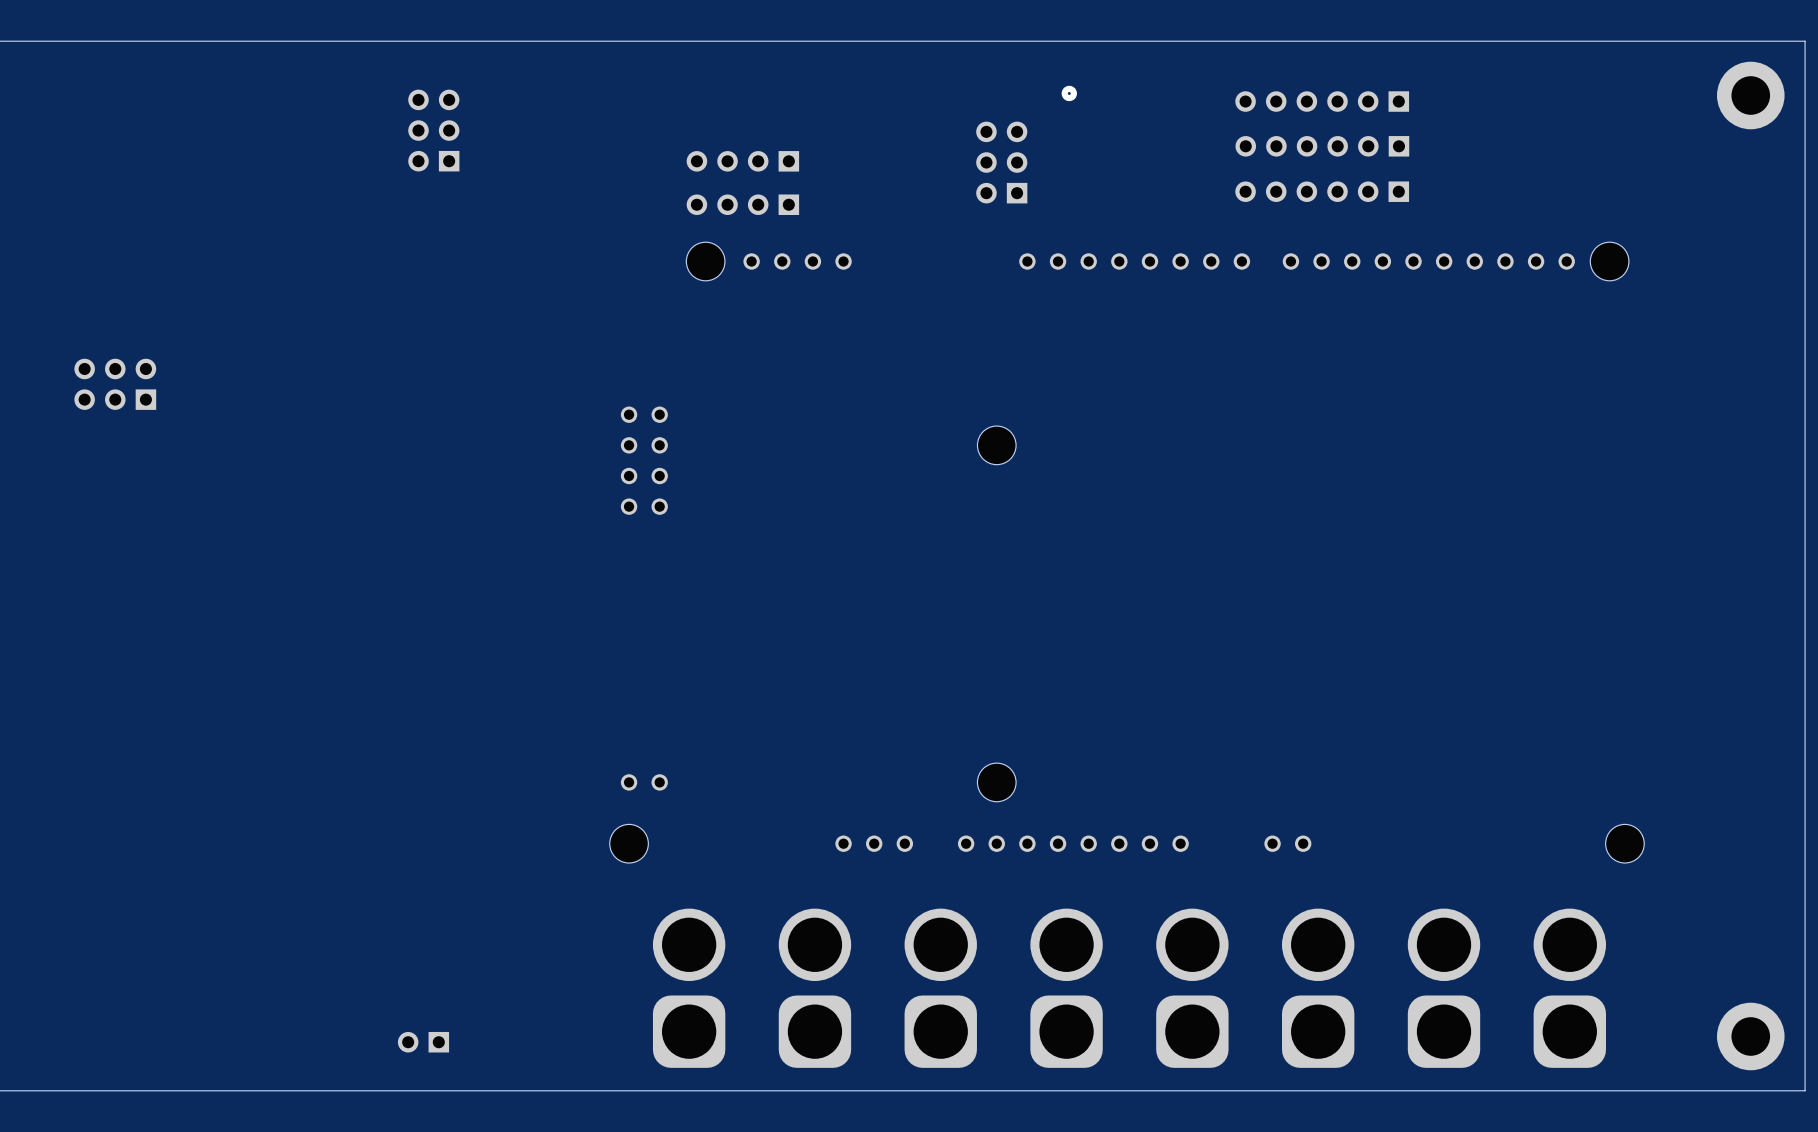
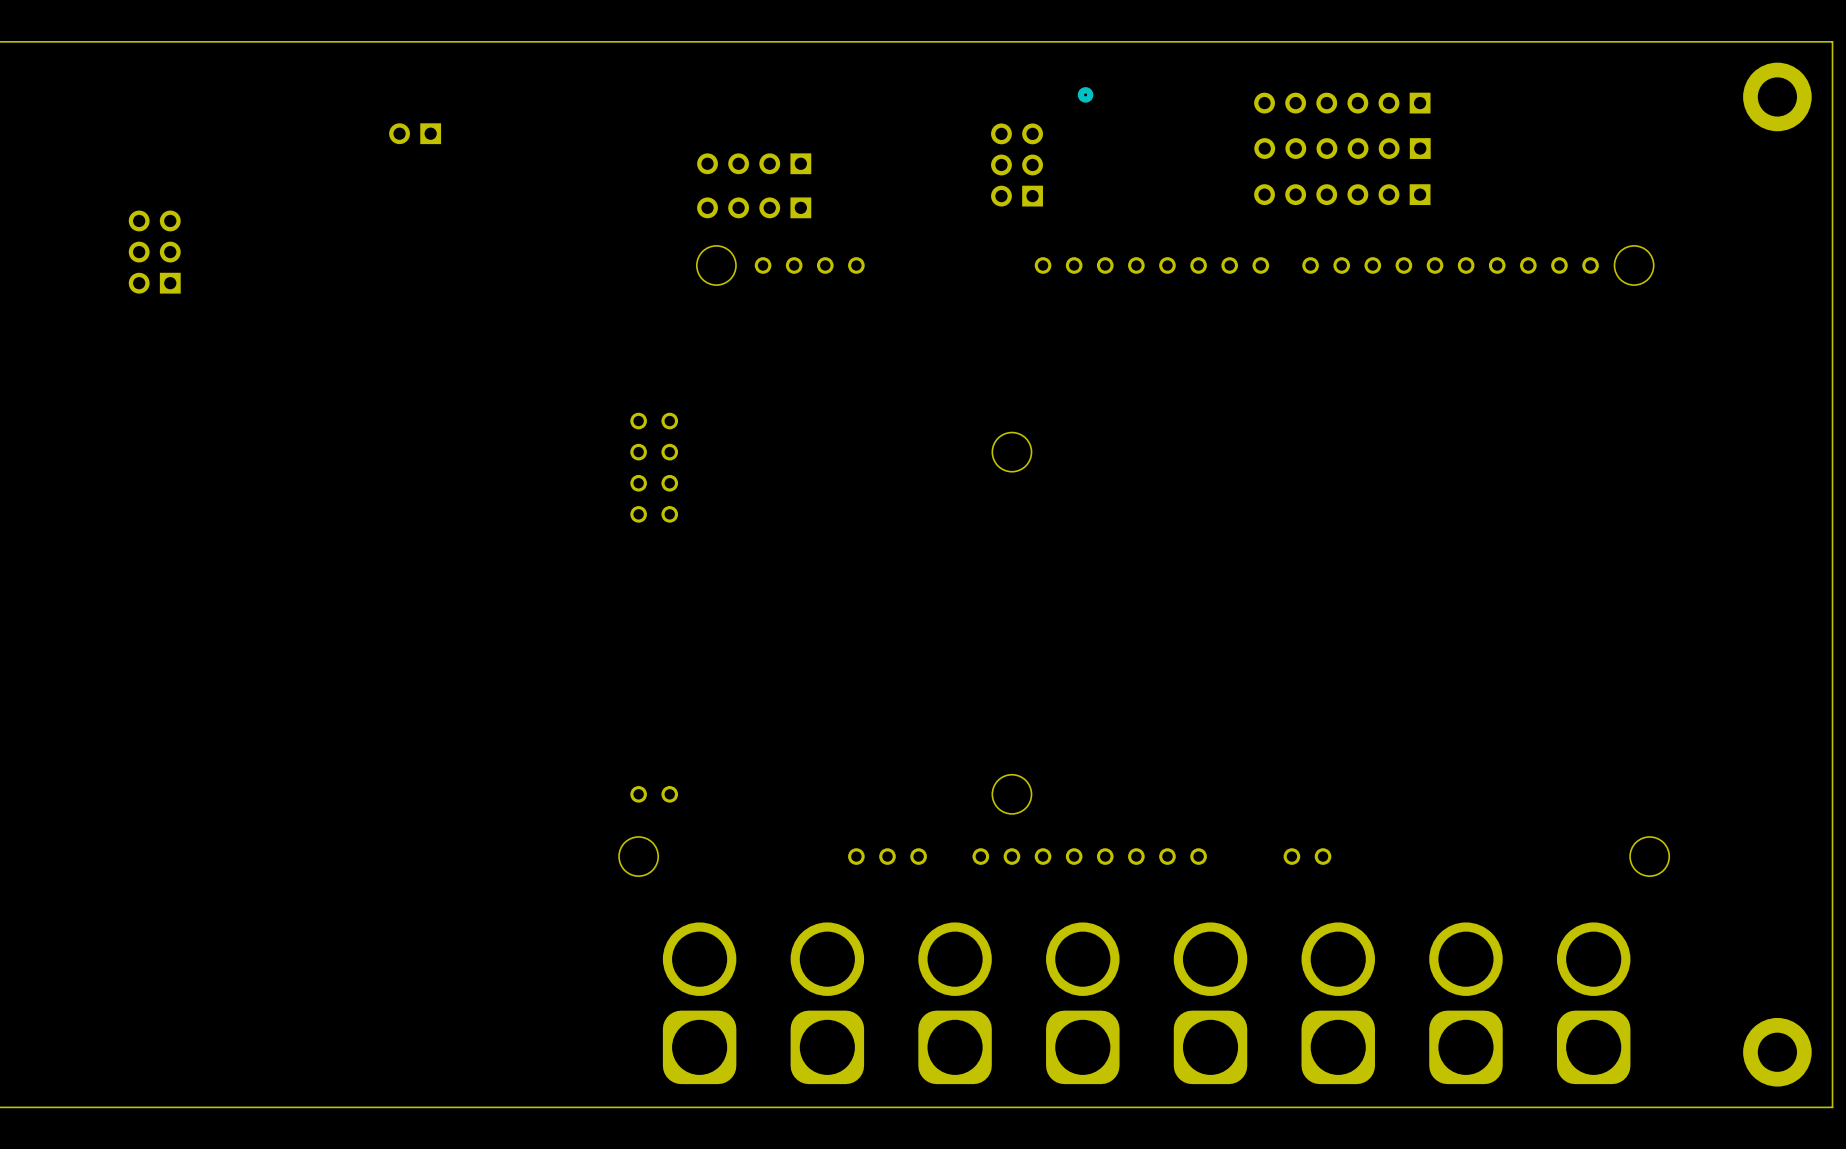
part: (433, 130) -> none
part: none -> (415, 133)
part: none -> (154, 252)
part: (115, 384) -> none
part: (423, 1042) -> none

